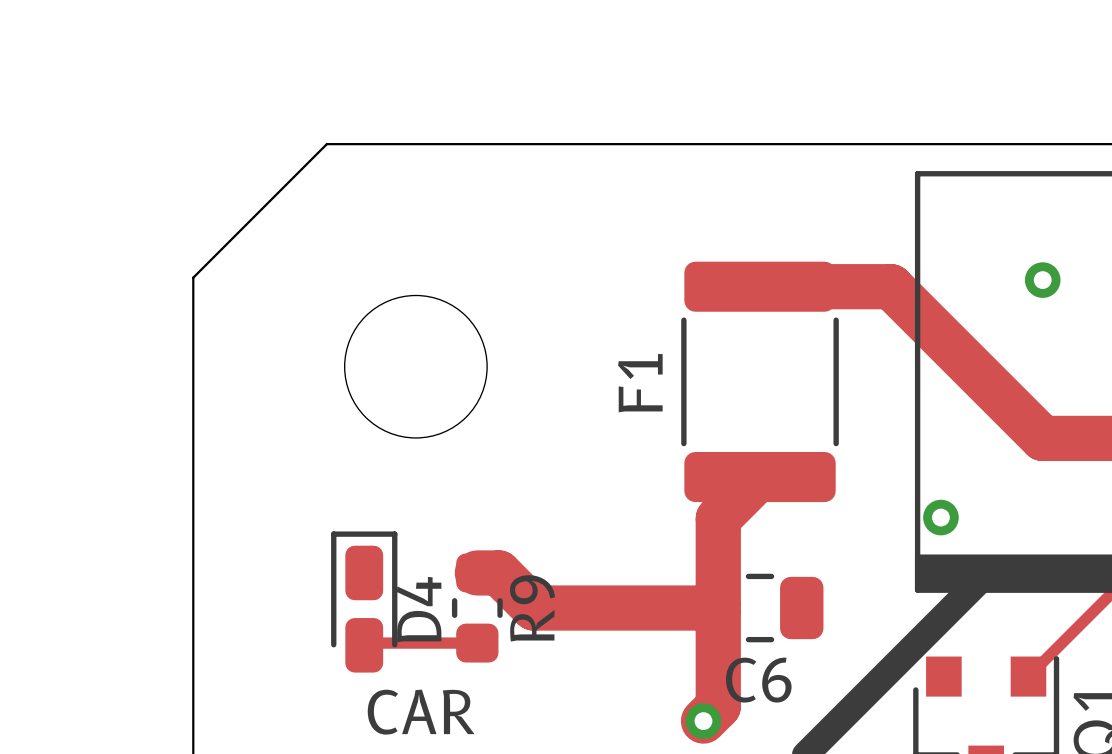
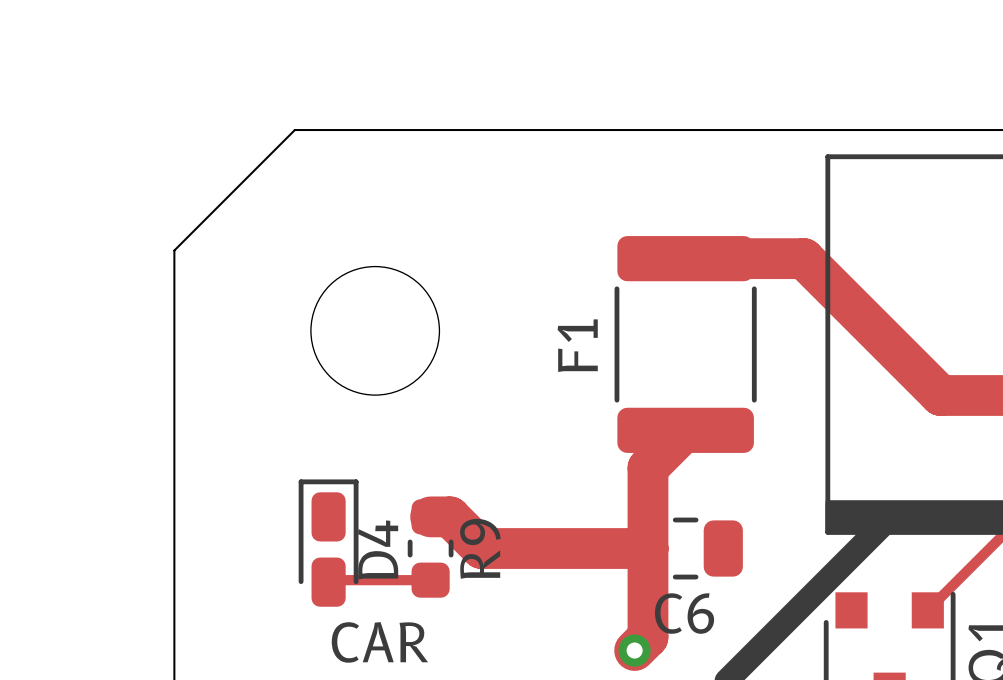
via: (1042, 280) -> none
via: (940, 517) -> none

